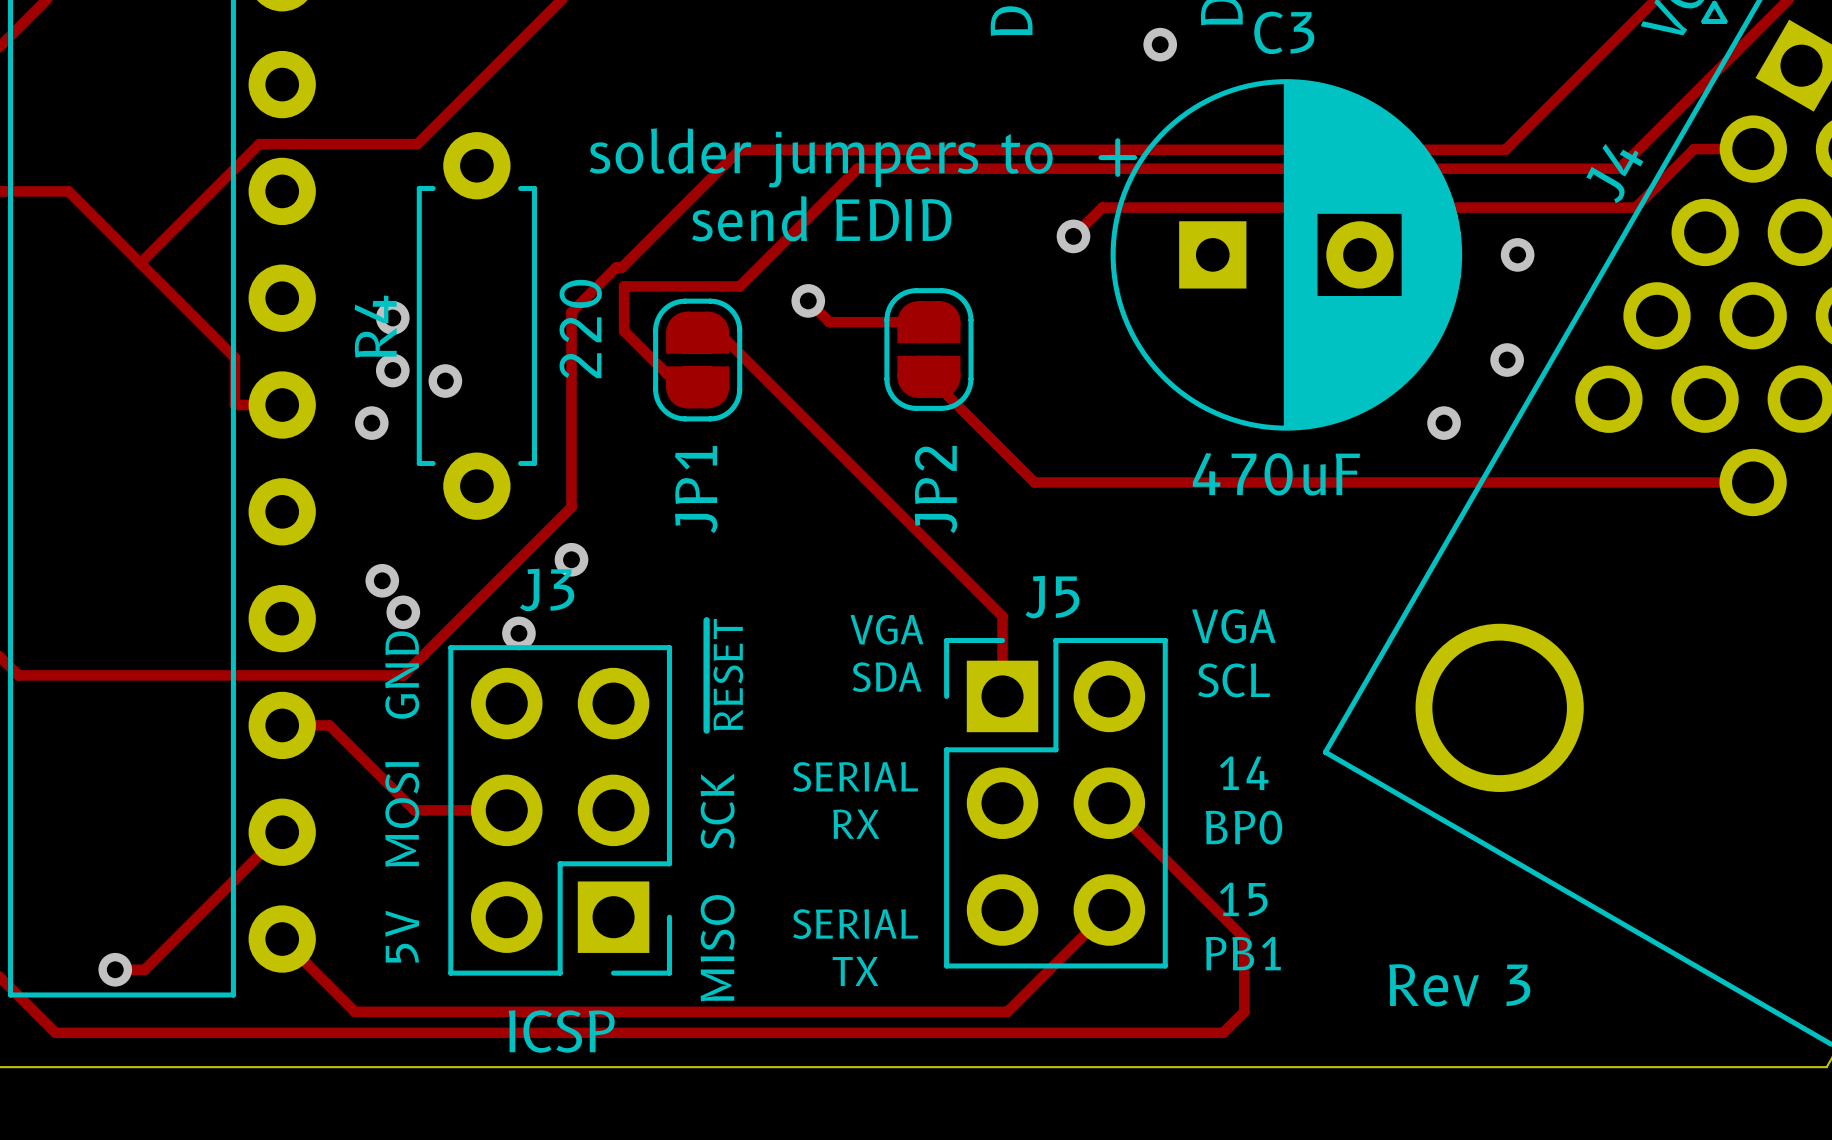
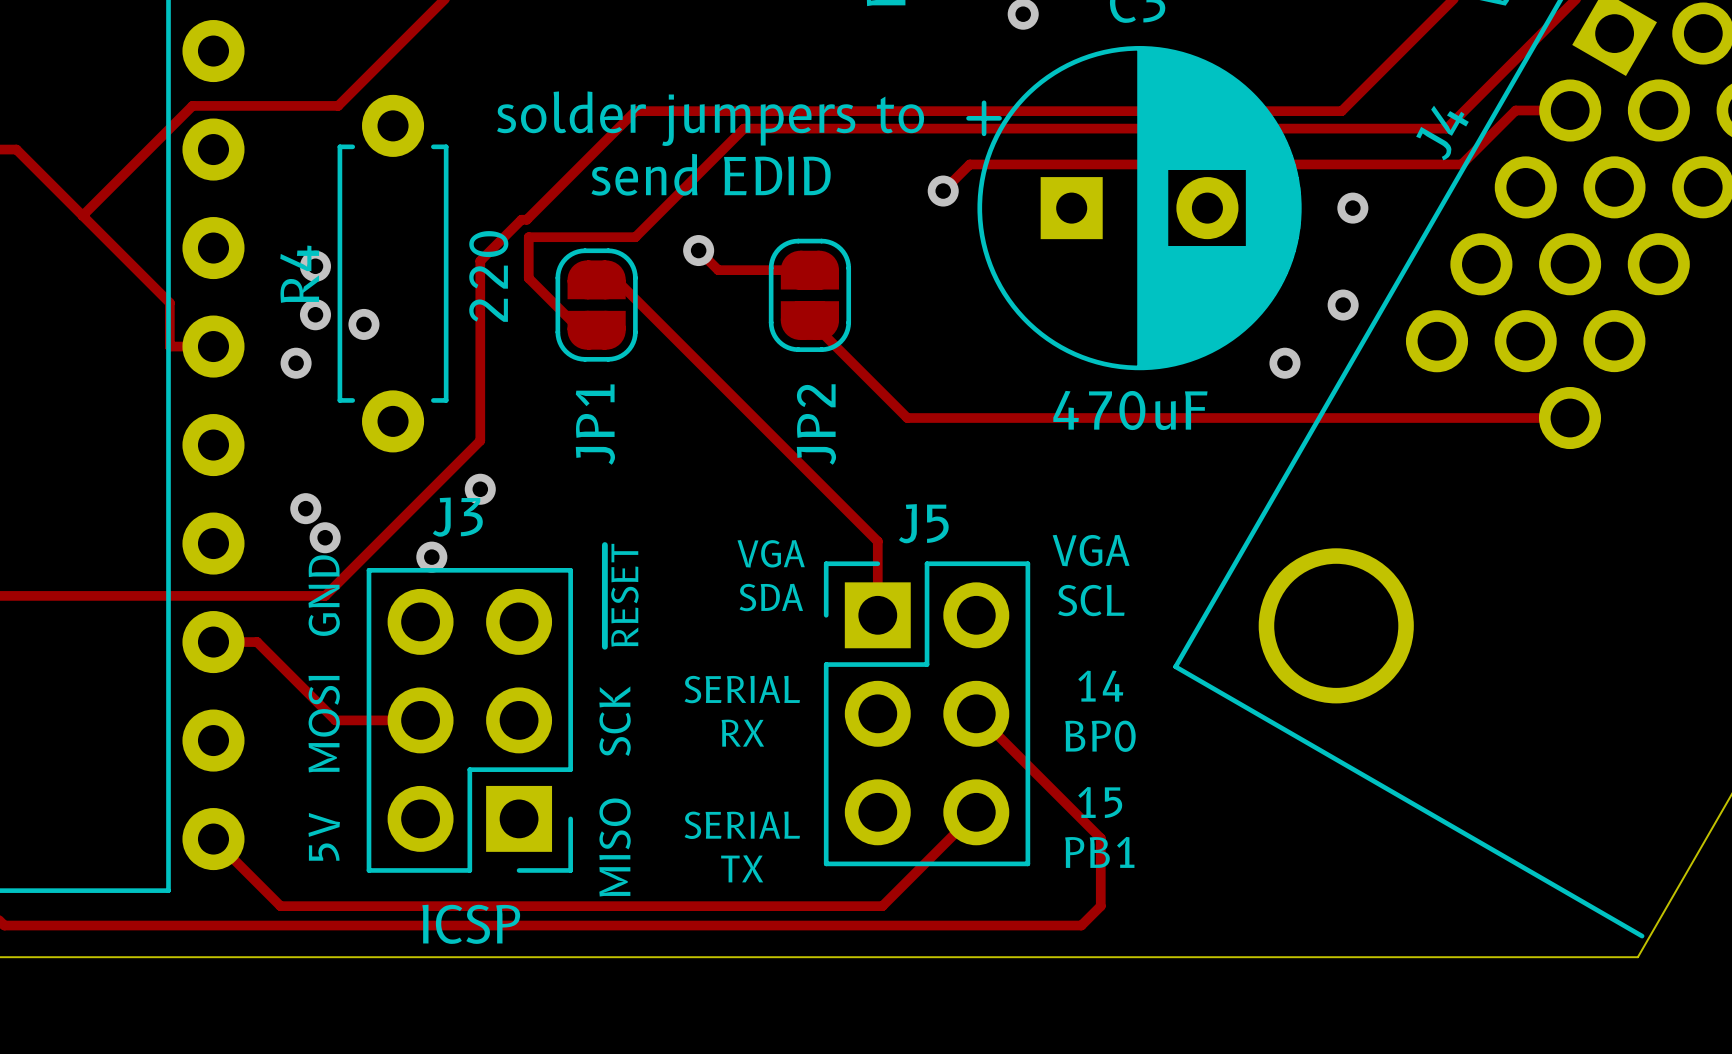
track: (282, 832) (144, 969) (115, 969) -> none
via: (115, 969) -> none
text: Rev 3 (1459, 985) -> none

